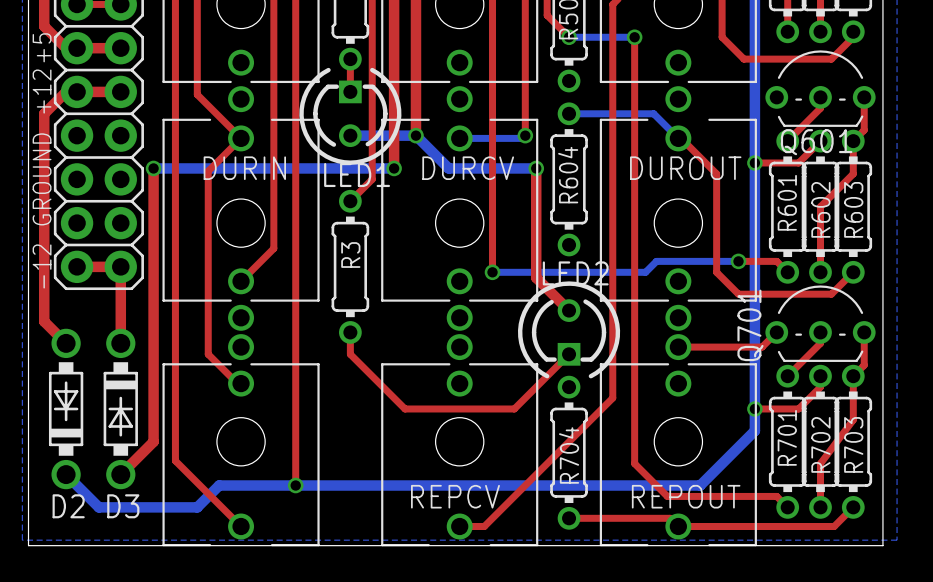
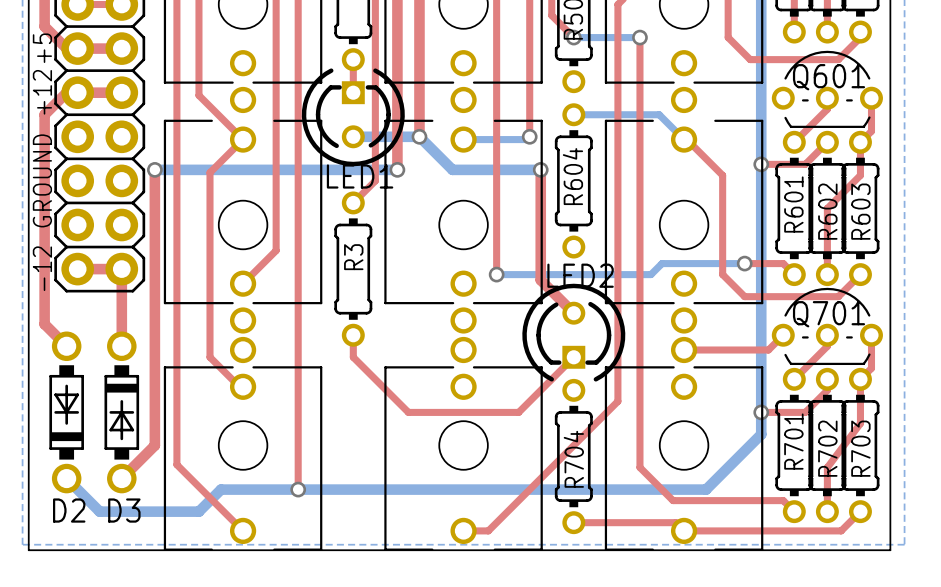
Q601 name position: Q601 (816, 142) -> Q601 (829, 77)
DURIN name: DURIN (244, 168) -> none
DURCV name: DURCV (468, 168) -> none
DUROUT name: DUROUT (685, 168) -> none
Q701 name rotation: 0° (750, 325) -> 90° clockwise (829, 314)
REPCV name: REPCV (455, 496) -> none
REPOUT name: REPOUT (686, 496) -> none

